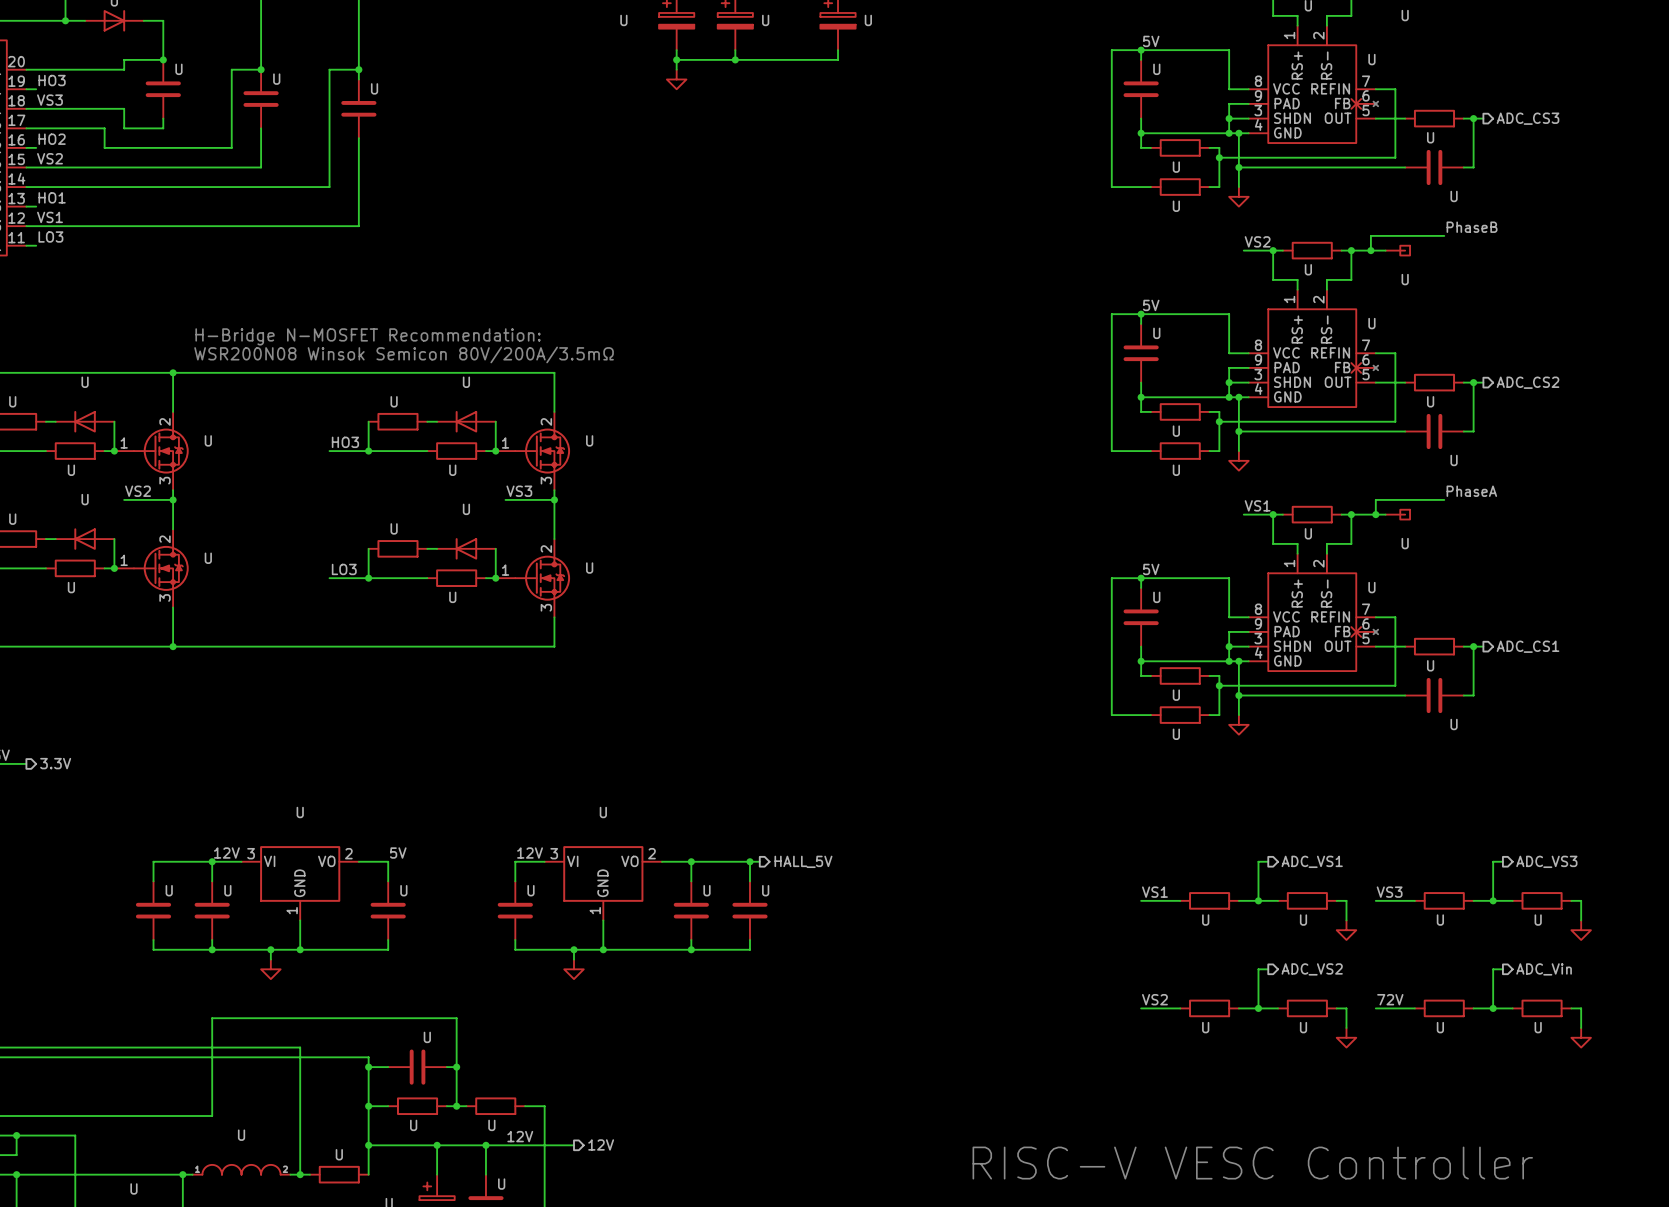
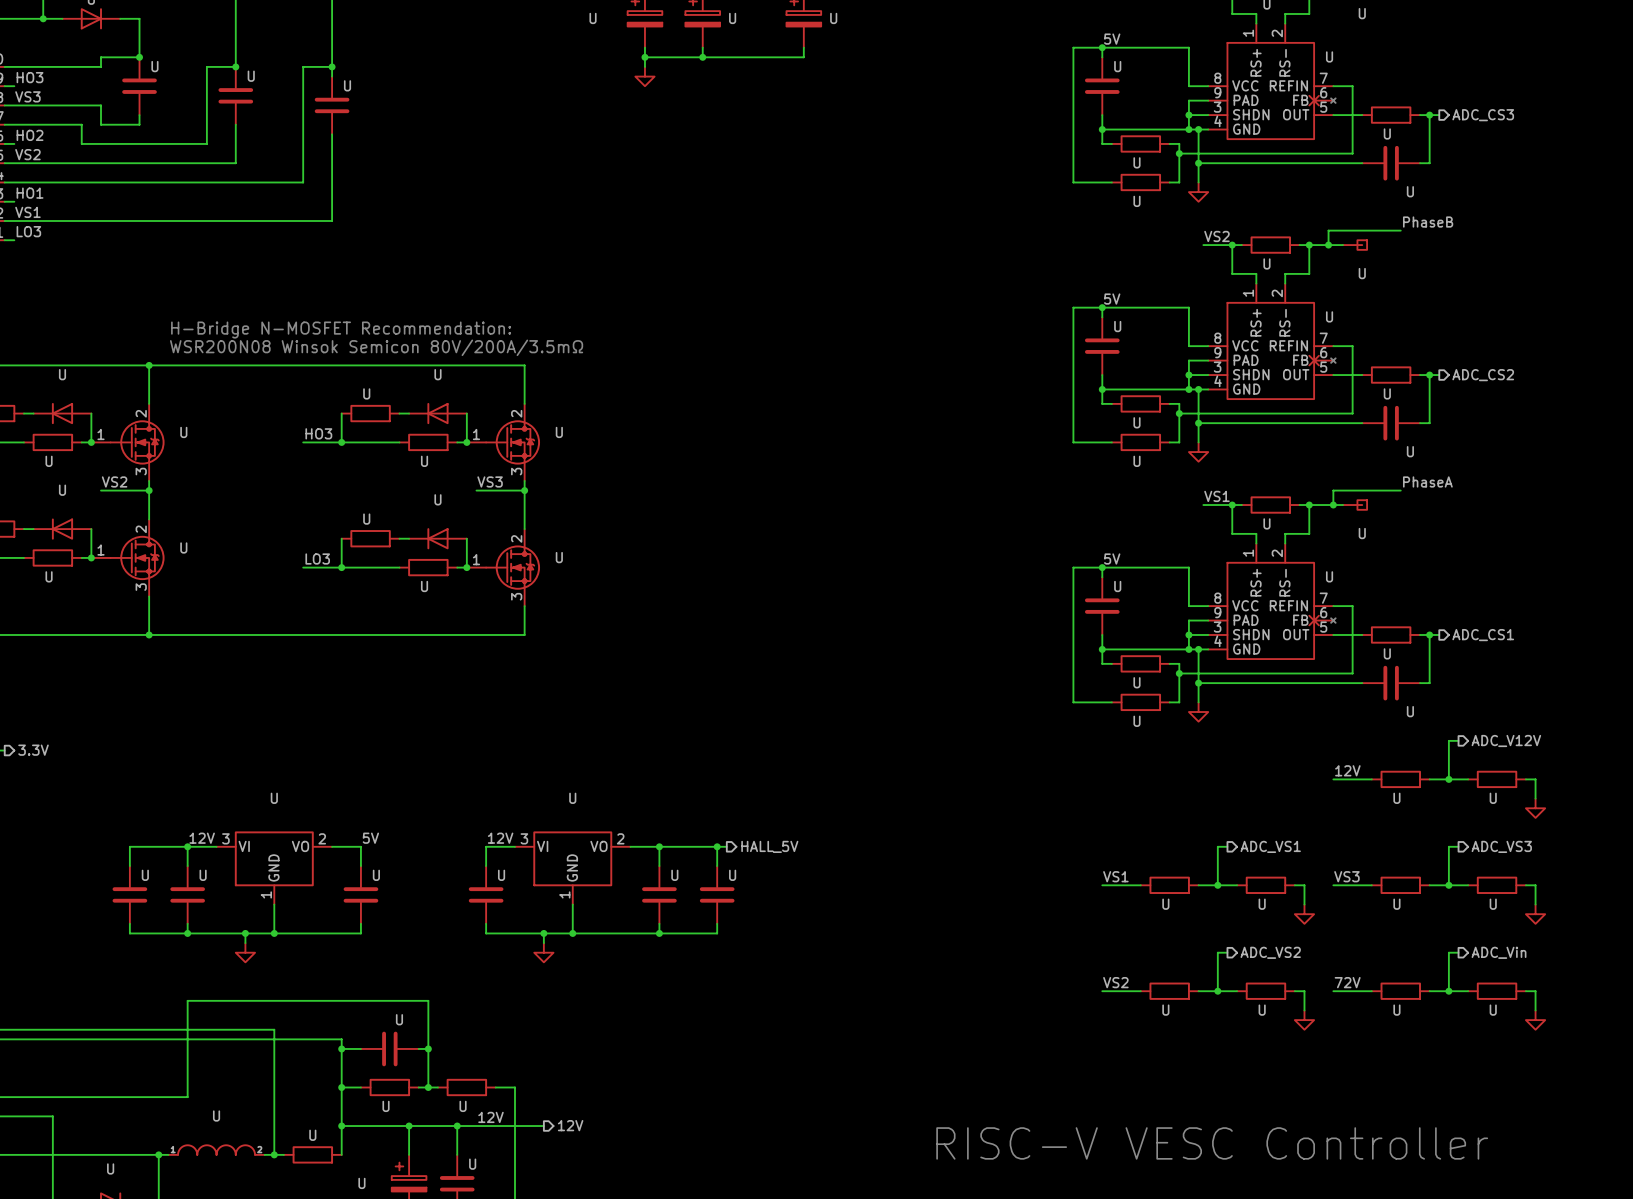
wire: none -> (1458, 740) (1448, 740) (1448, 779)
hierarchical label: none -> ADC_V12V (1506, 740)
label: none -> 12V (1347, 770)
wire: none -> (1333, 779) (1371, 779)
U: none -> (1400, 779)
wire: none -> (1429, 779) (1468, 779)
junction: none -> (1448, 779)
U: none -> (1497, 779)
wire: none -> (1525, 779) (1535, 779) (1535, 798)
power symbol: none -> (1535, 808)

